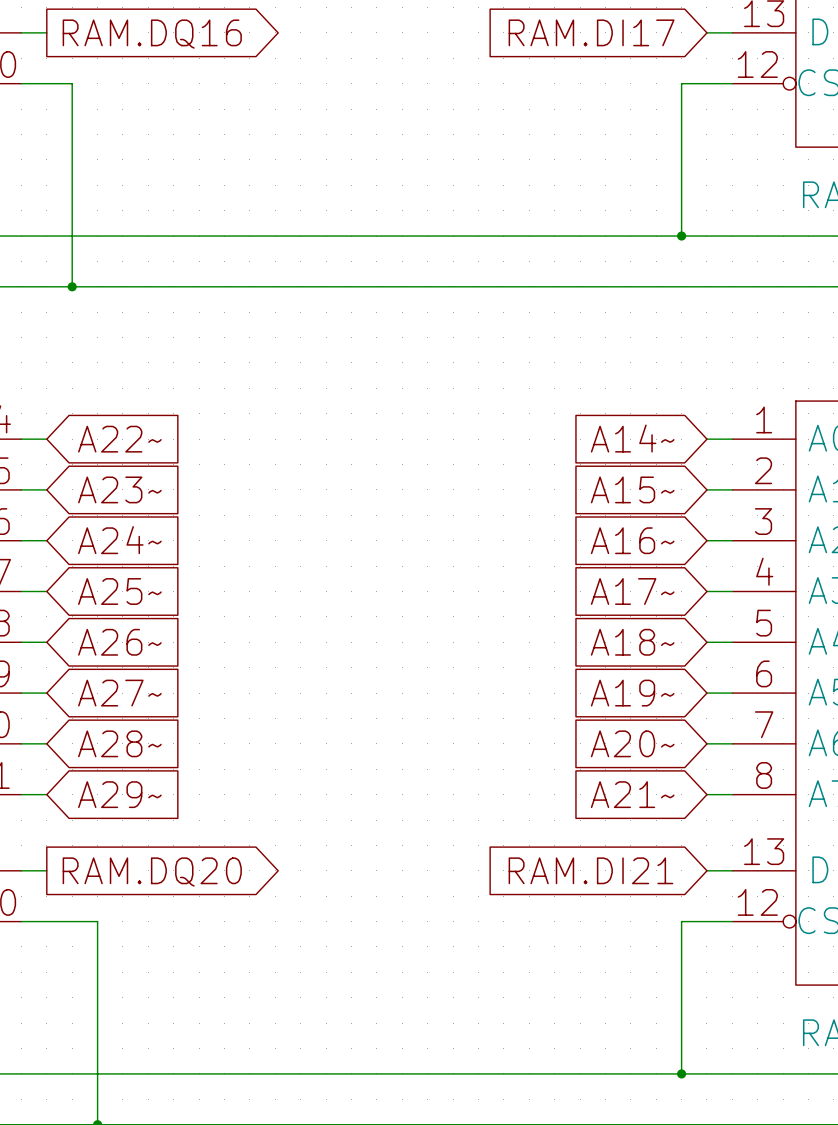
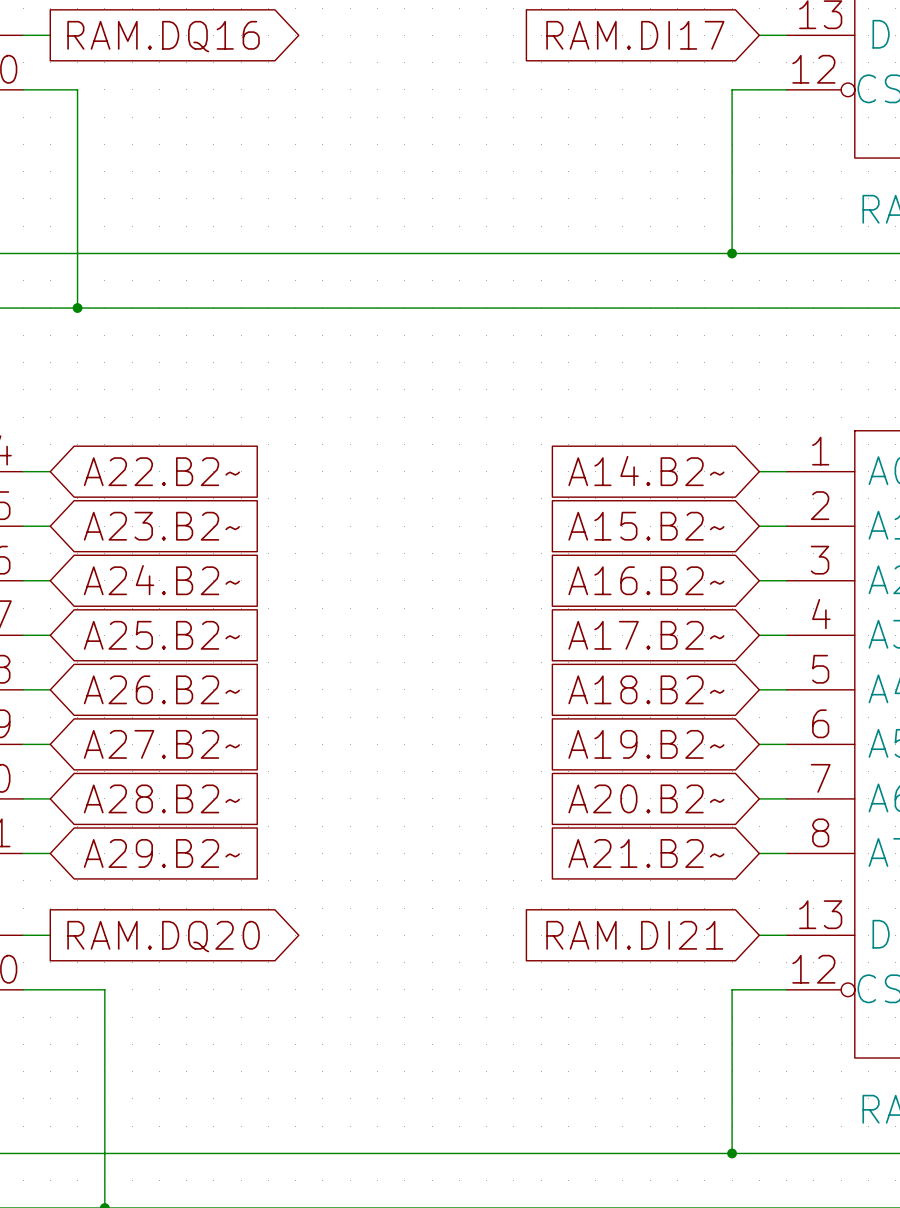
global label: A14~ (632, 438) -> A14.B2~ (646, 471)
global label: A22~ (119, 439) -> A22.B2~ (161, 471)
global label: A23~ (119, 489) -> A23.B2~ (161, 526)
global label: A15~ (632, 489) -> A15.B2~ (646, 526)
global label: A24~ (119, 540) -> A24.B2~ (161, 580)
global label: A16~ (632, 540) -> A16.B2~ (646, 580)
global label: A25~ (119, 591) -> A25.B2~ (161, 635)
global label: A17~ (632, 591) -> A17.B2~ (646, 635)
global label: A26~ (119, 642) -> A26.B2~ (161, 689)
global label: A18~ (632, 642) -> A18.B2~ (646, 689)
global label: A27~ (119, 693) -> A27.B2~ (161, 744)
global label: A19~ (632, 693) -> A19.B2~ (646, 744)
global label: A28~ (119, 743) -> A28.B2~ (161, 798)
global label: A20~ (632, 743) -> A20.B2~ (646, 798)
global label: A29~ (119, 794) -> A29.B2~ (161, 853)
global label: A21~ (632, 794) -> A21.B2~ (646, 853)

